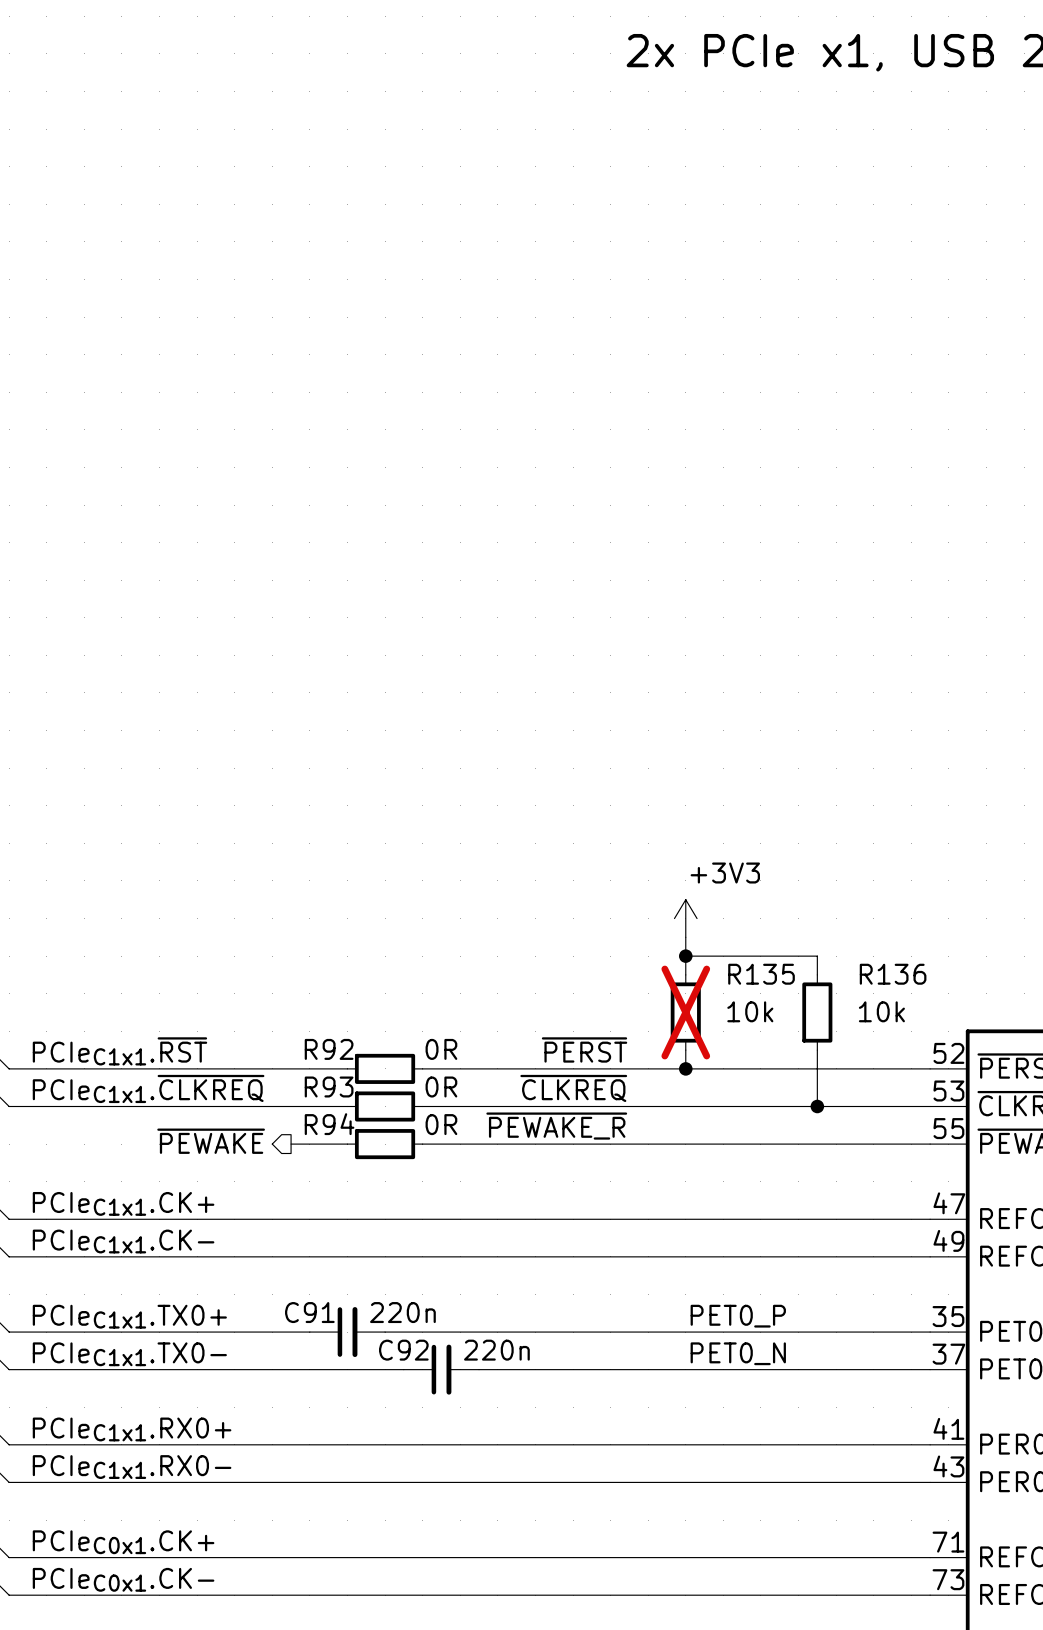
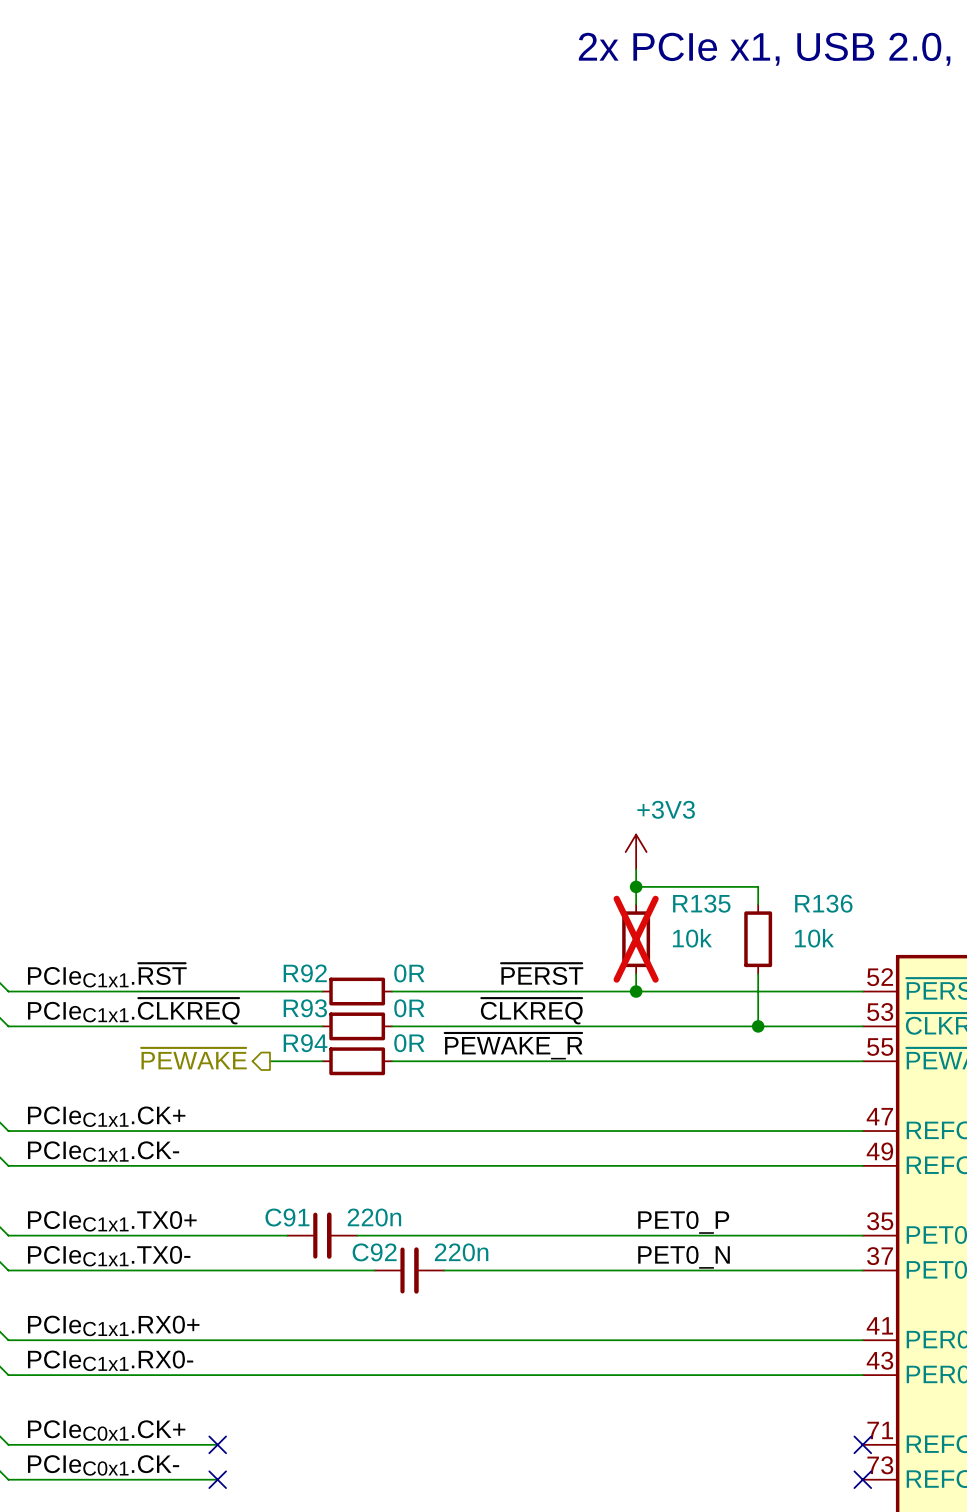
wire: (234, 1557) (930, 1557) -> none
no-connect mark: none -> (217, 1444)
no-connect mark: none -> (862, 1444)
wire: (234, 1595) (930, 1595) -> none
no-connect mark: none -> (217, 1479)
no-connect mark: none -> (862, 1479)

